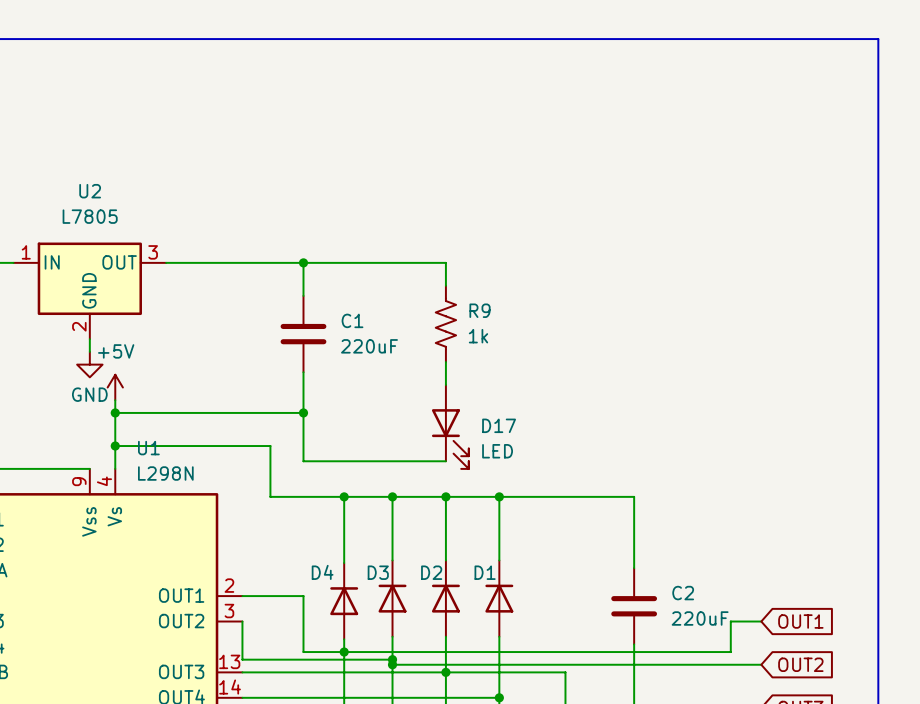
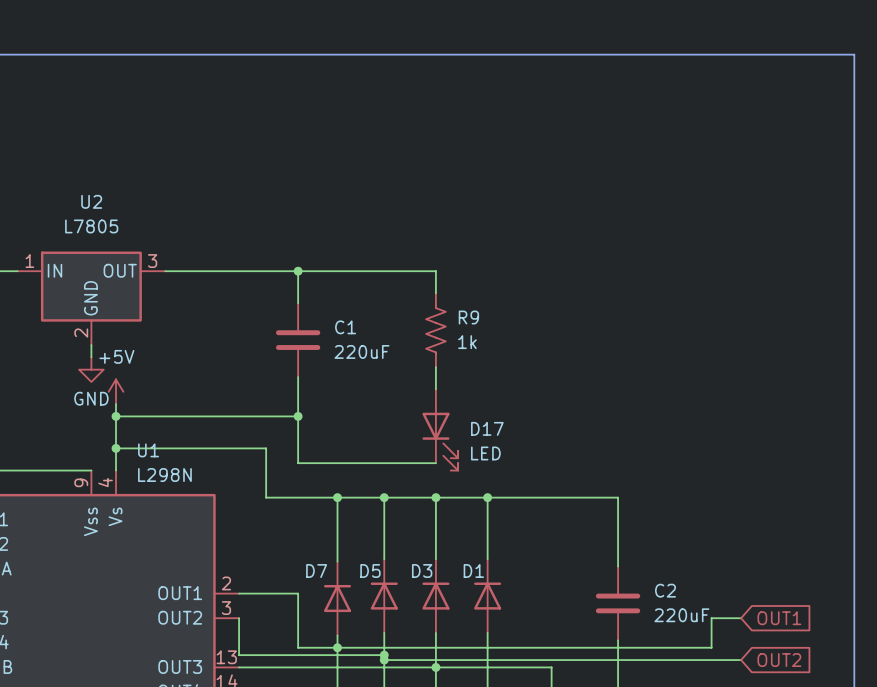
D4 name: D4 (322, 572) -> D7 (316, 570)
D3 name: D3 (378, 572) -> D5 (370, 570)
D2 name: D2 (431, 572) -> D3 (422, 570)

